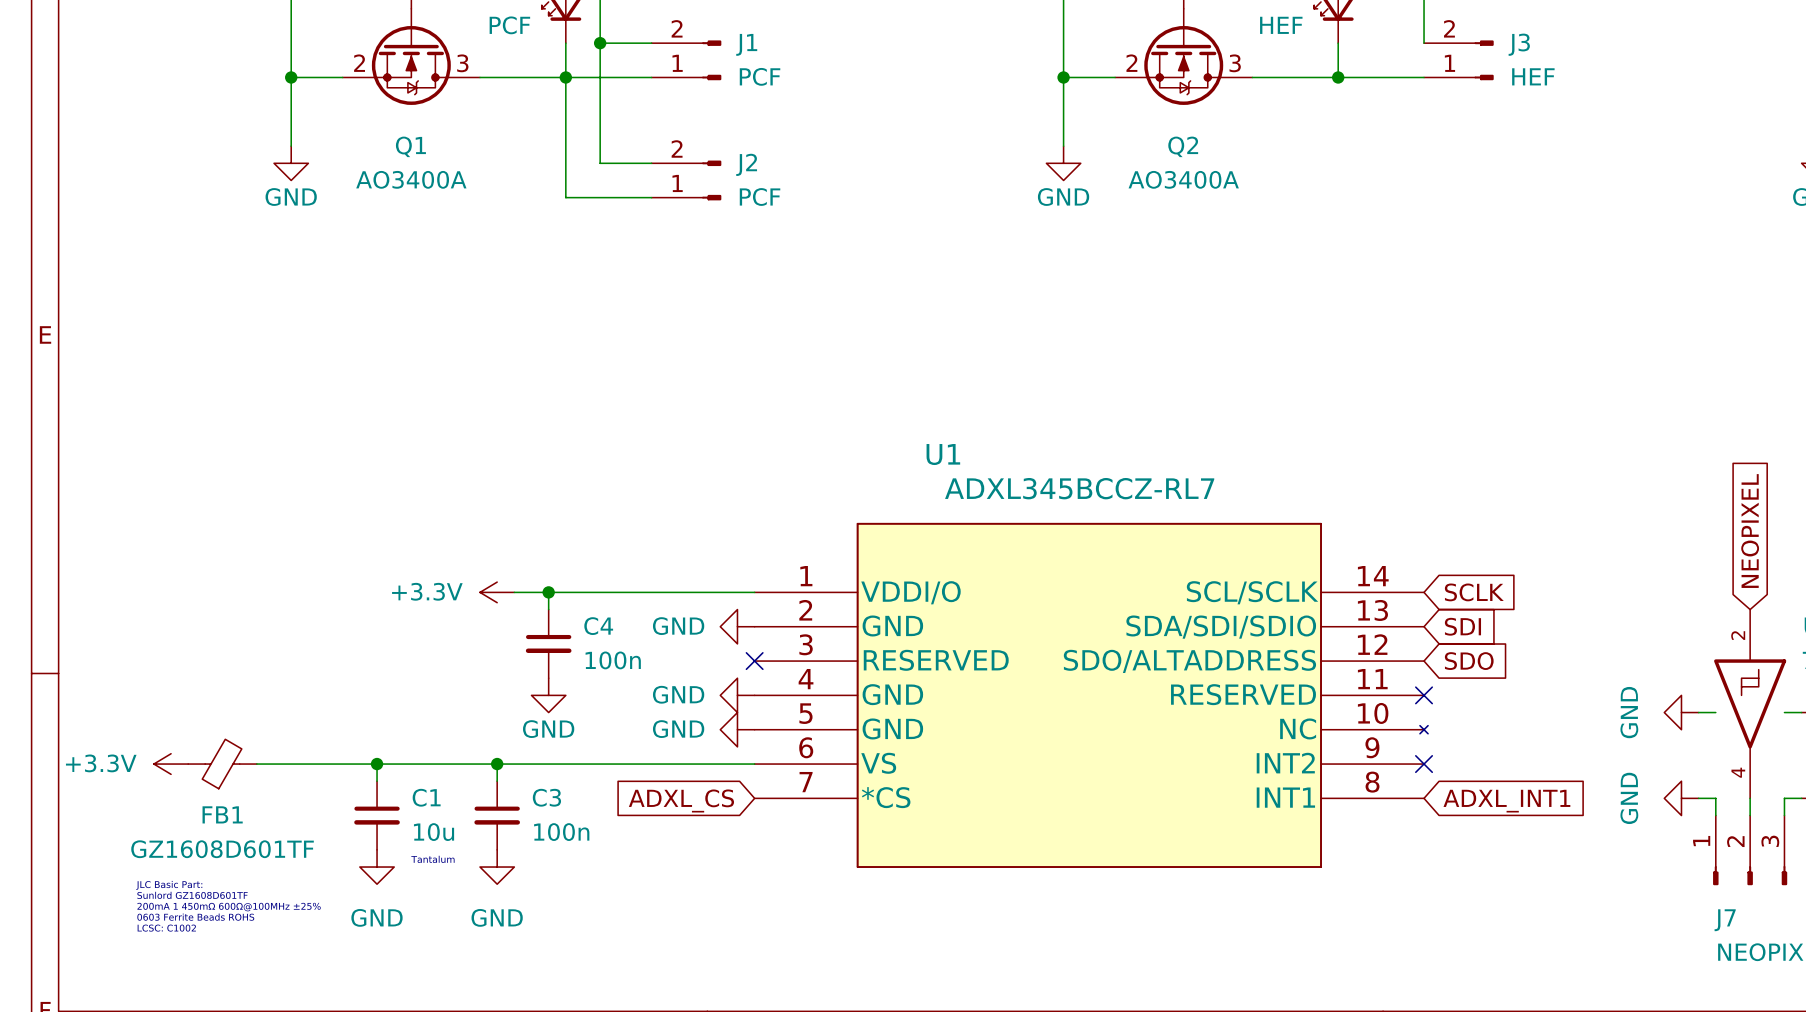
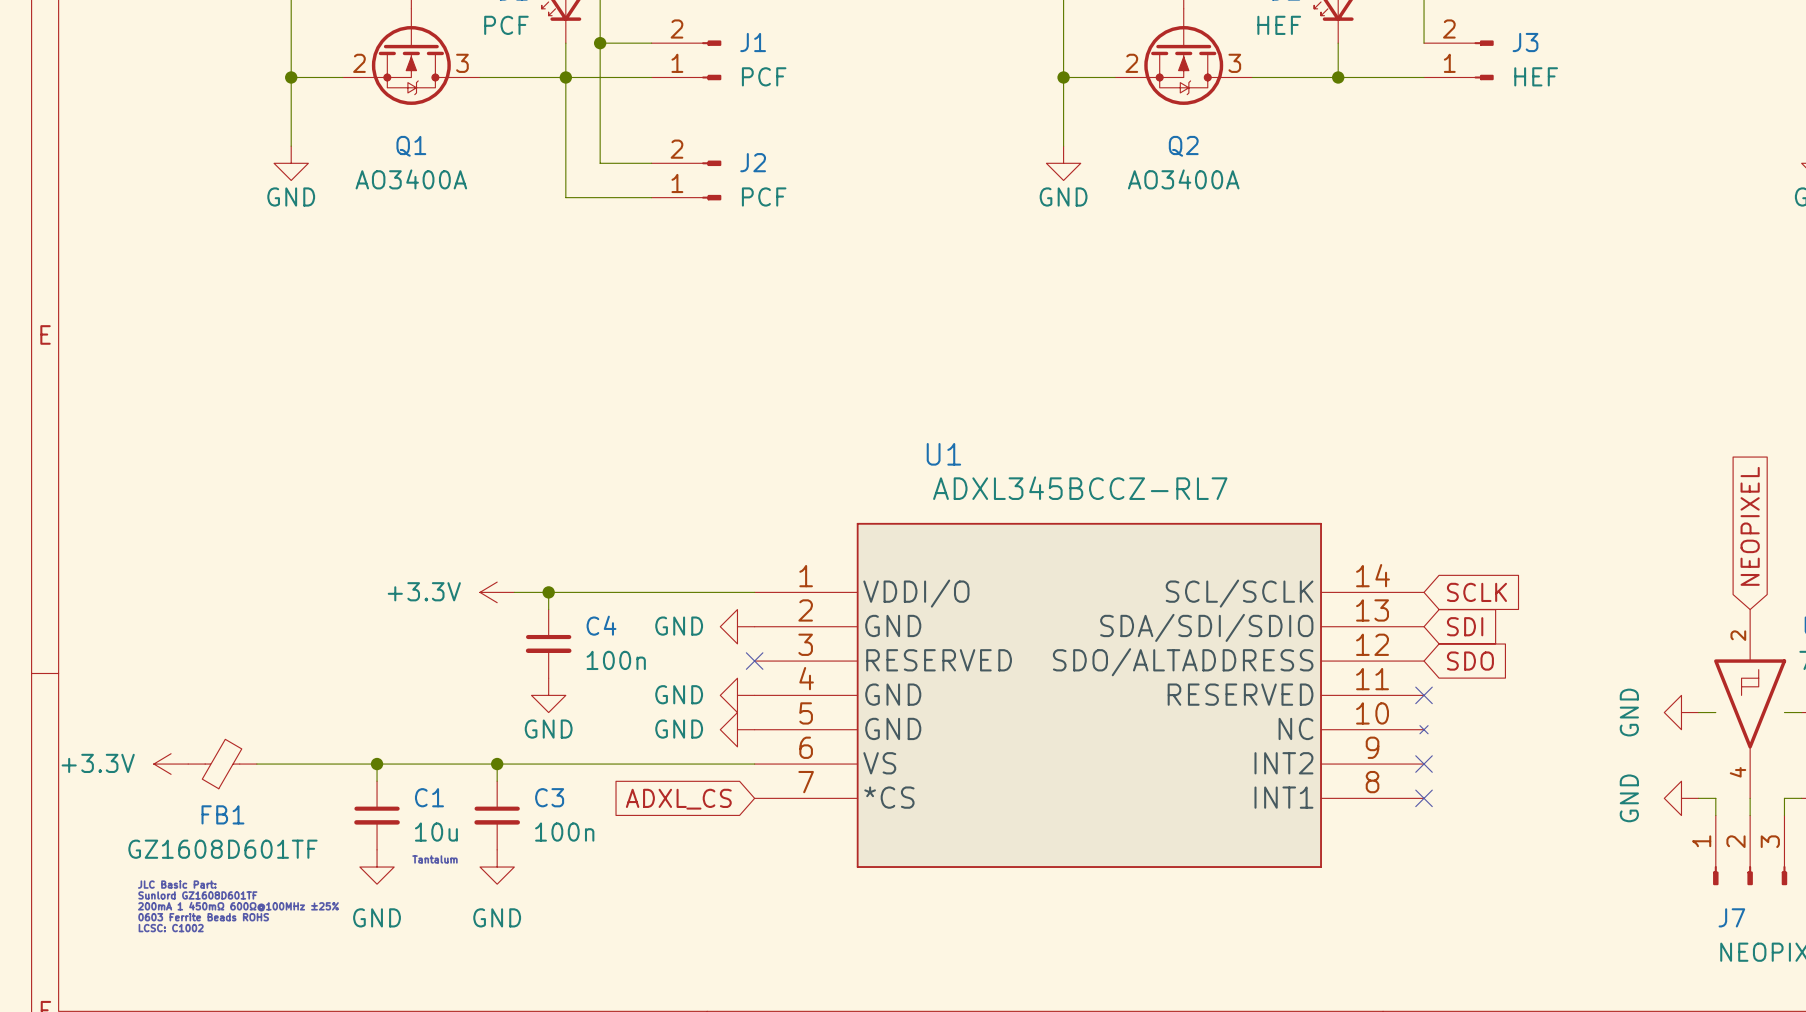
no-connect mark: none -> (1424, 798)
global label: ADXL_INT1 (1506, 801) -> none

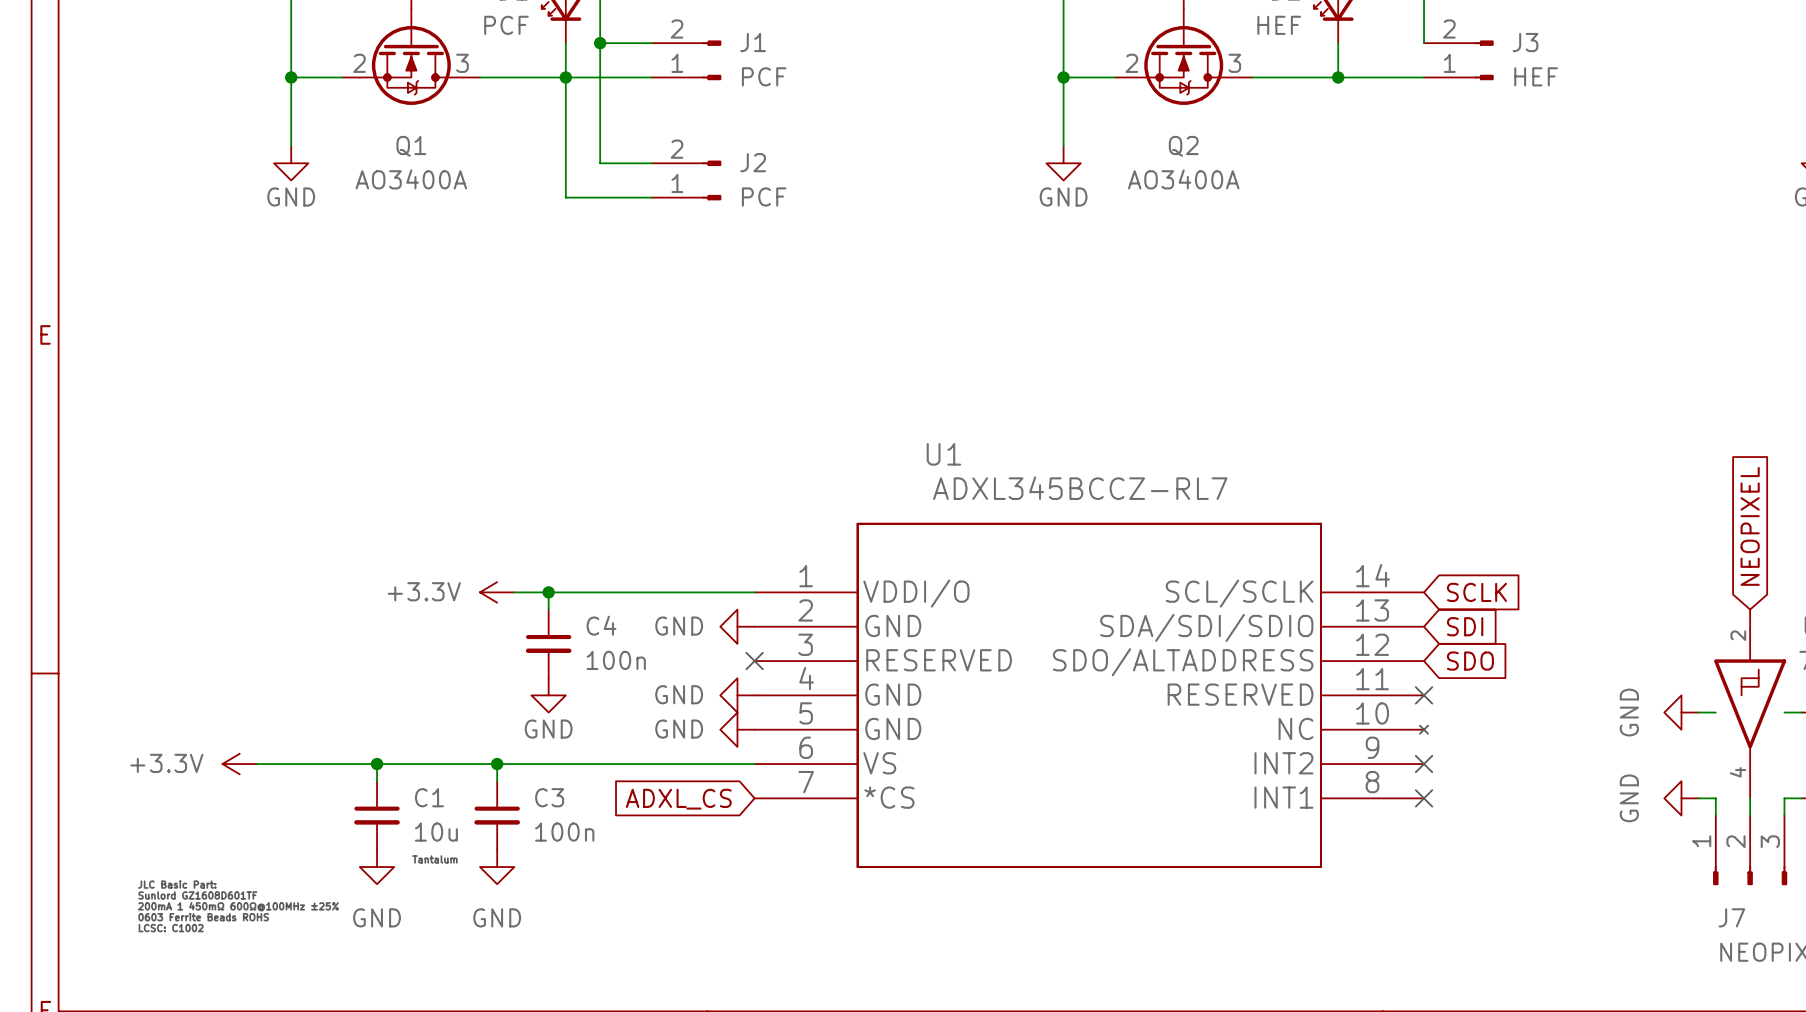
power symbol position: +3.3V (171, 764) -> +3.3V (239, 764)
FB1: GZ1608D601TF (222, 764) -> none

